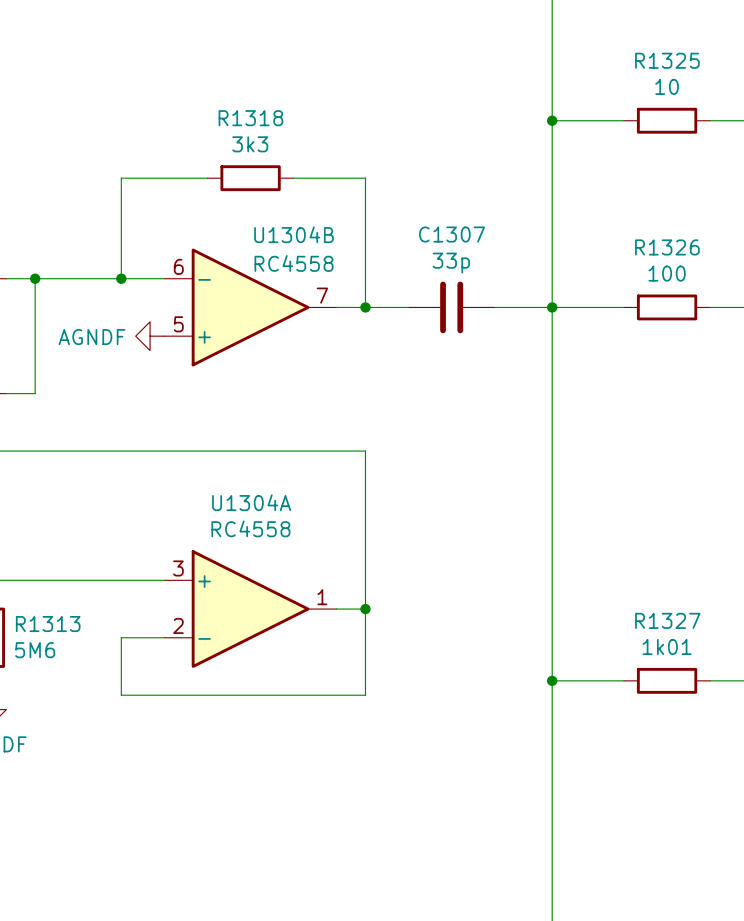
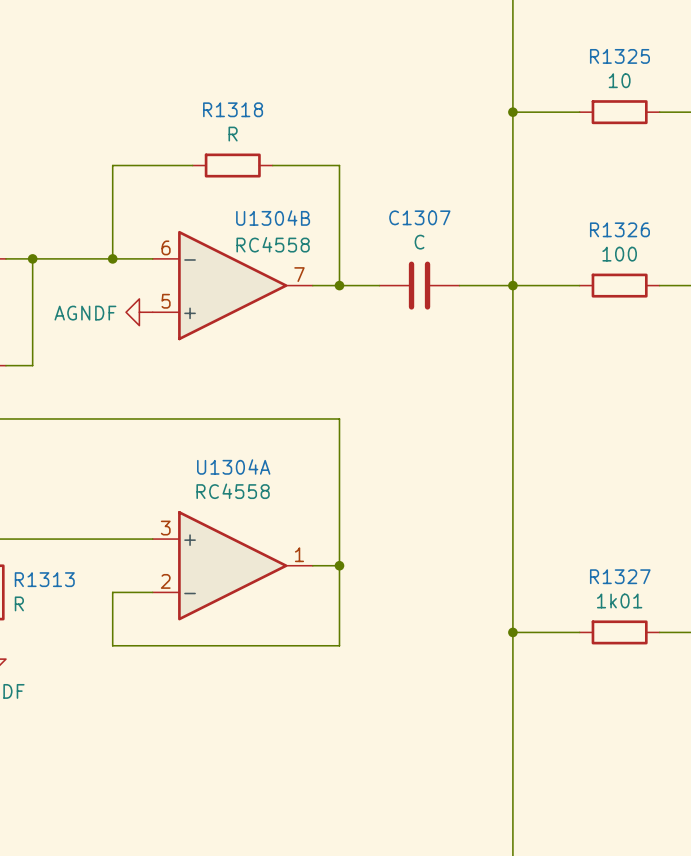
R1318 value: 3k3 (250, 144) -> R (233, 134)
C1307 value: 33p (451, 263) -> C (419, 242)
R1313 value: 5M6 (35, 650) -> R (19, 603)

